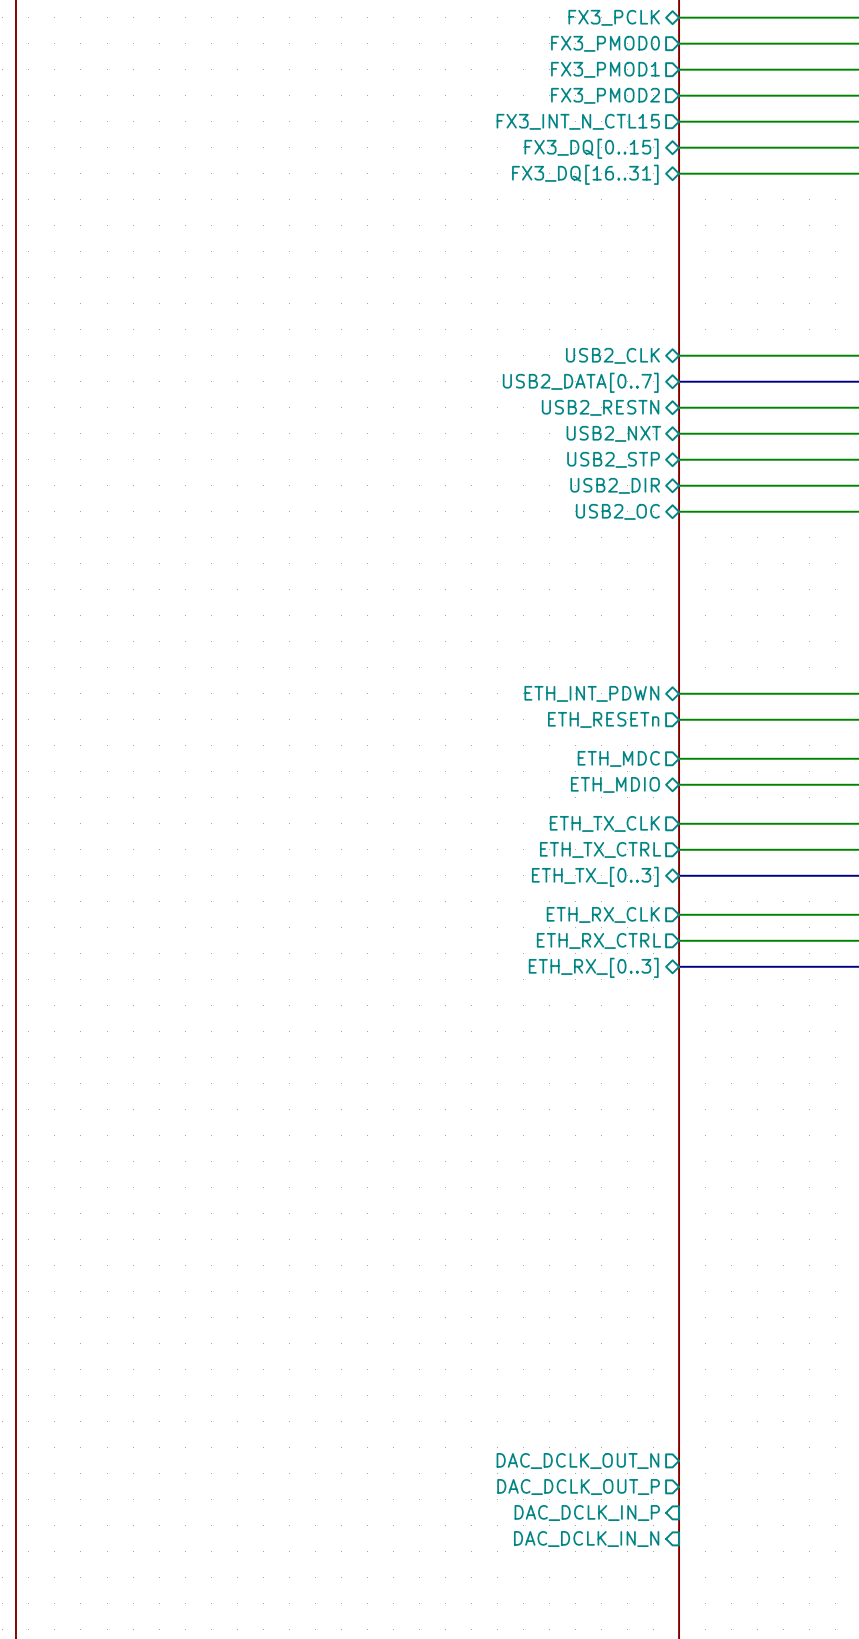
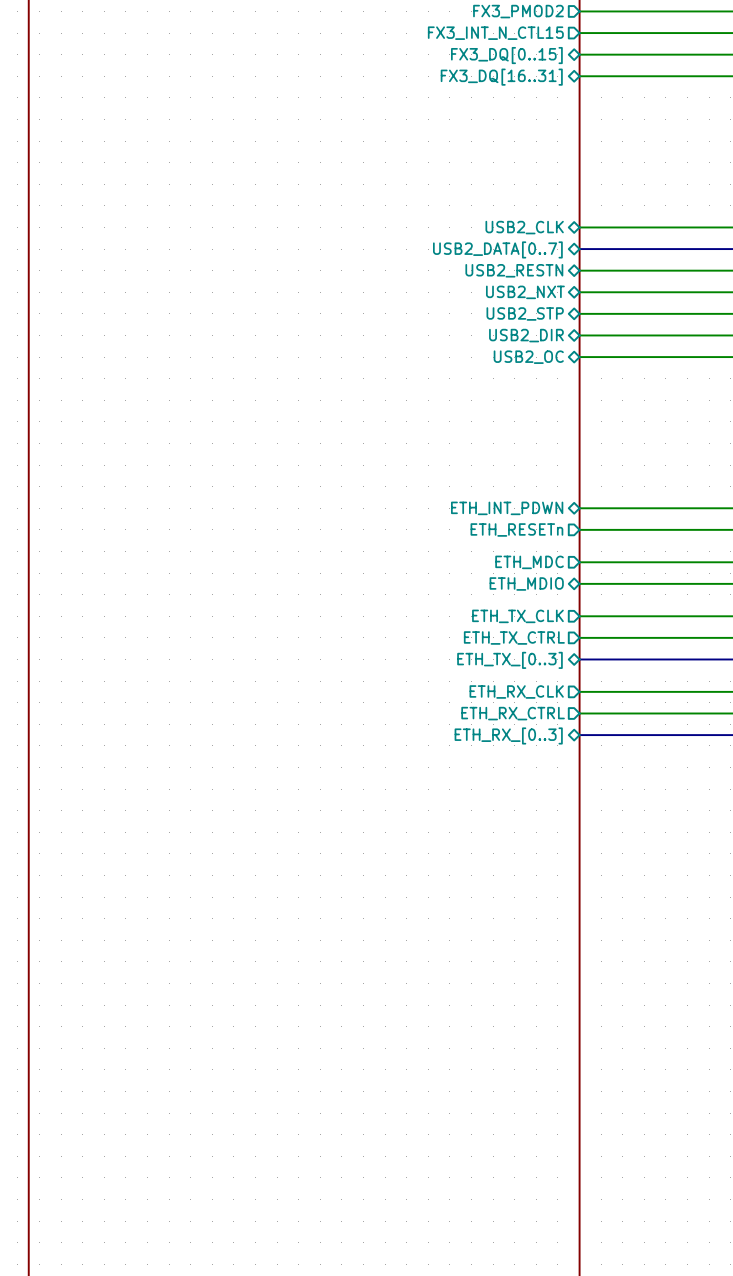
sheet pin: DAC_DCLK_OUT_N (577, 1461) -> none
sheet pin: DAC_DCLK_OUT_P (578, 1487) -> none
sheet pin: DAC_DCLK_IN_P (587, 1513) -> none
sheet pin: DAC_DCLK_IN_N (586, 1539) -> none

